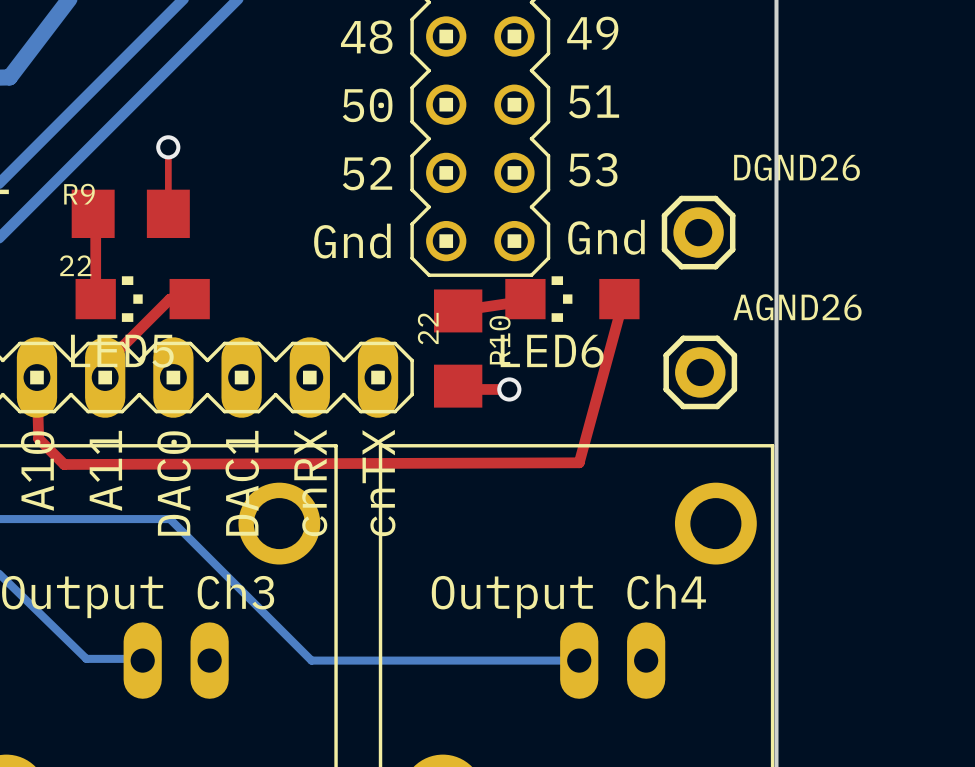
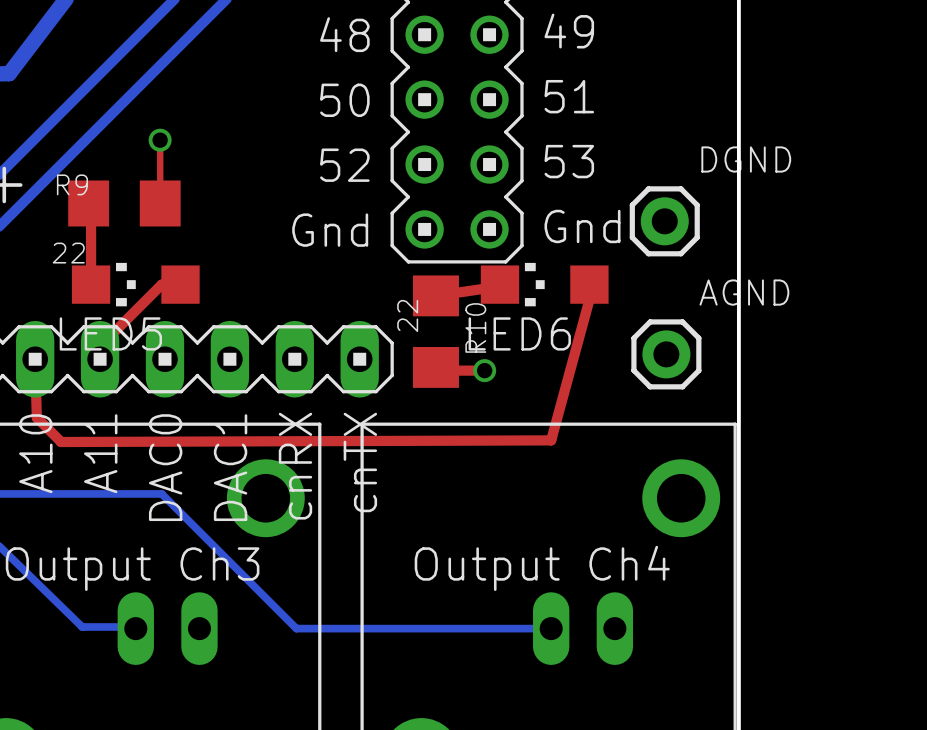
DGND26 name: DGND26 (797, 167) -> DGND (746, 159)
AGND26 name: AGND26 (797, 307) -> AGND (744, 292)

